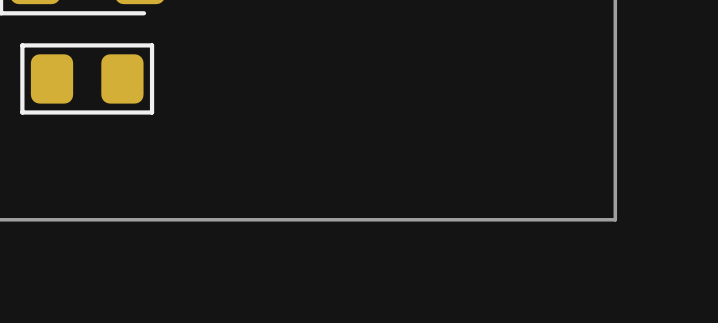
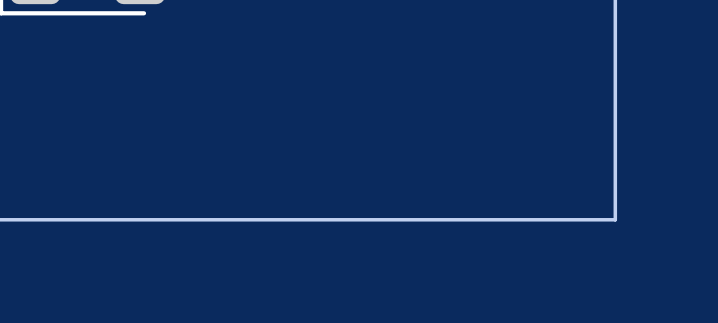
part: (87, 78) -> none

